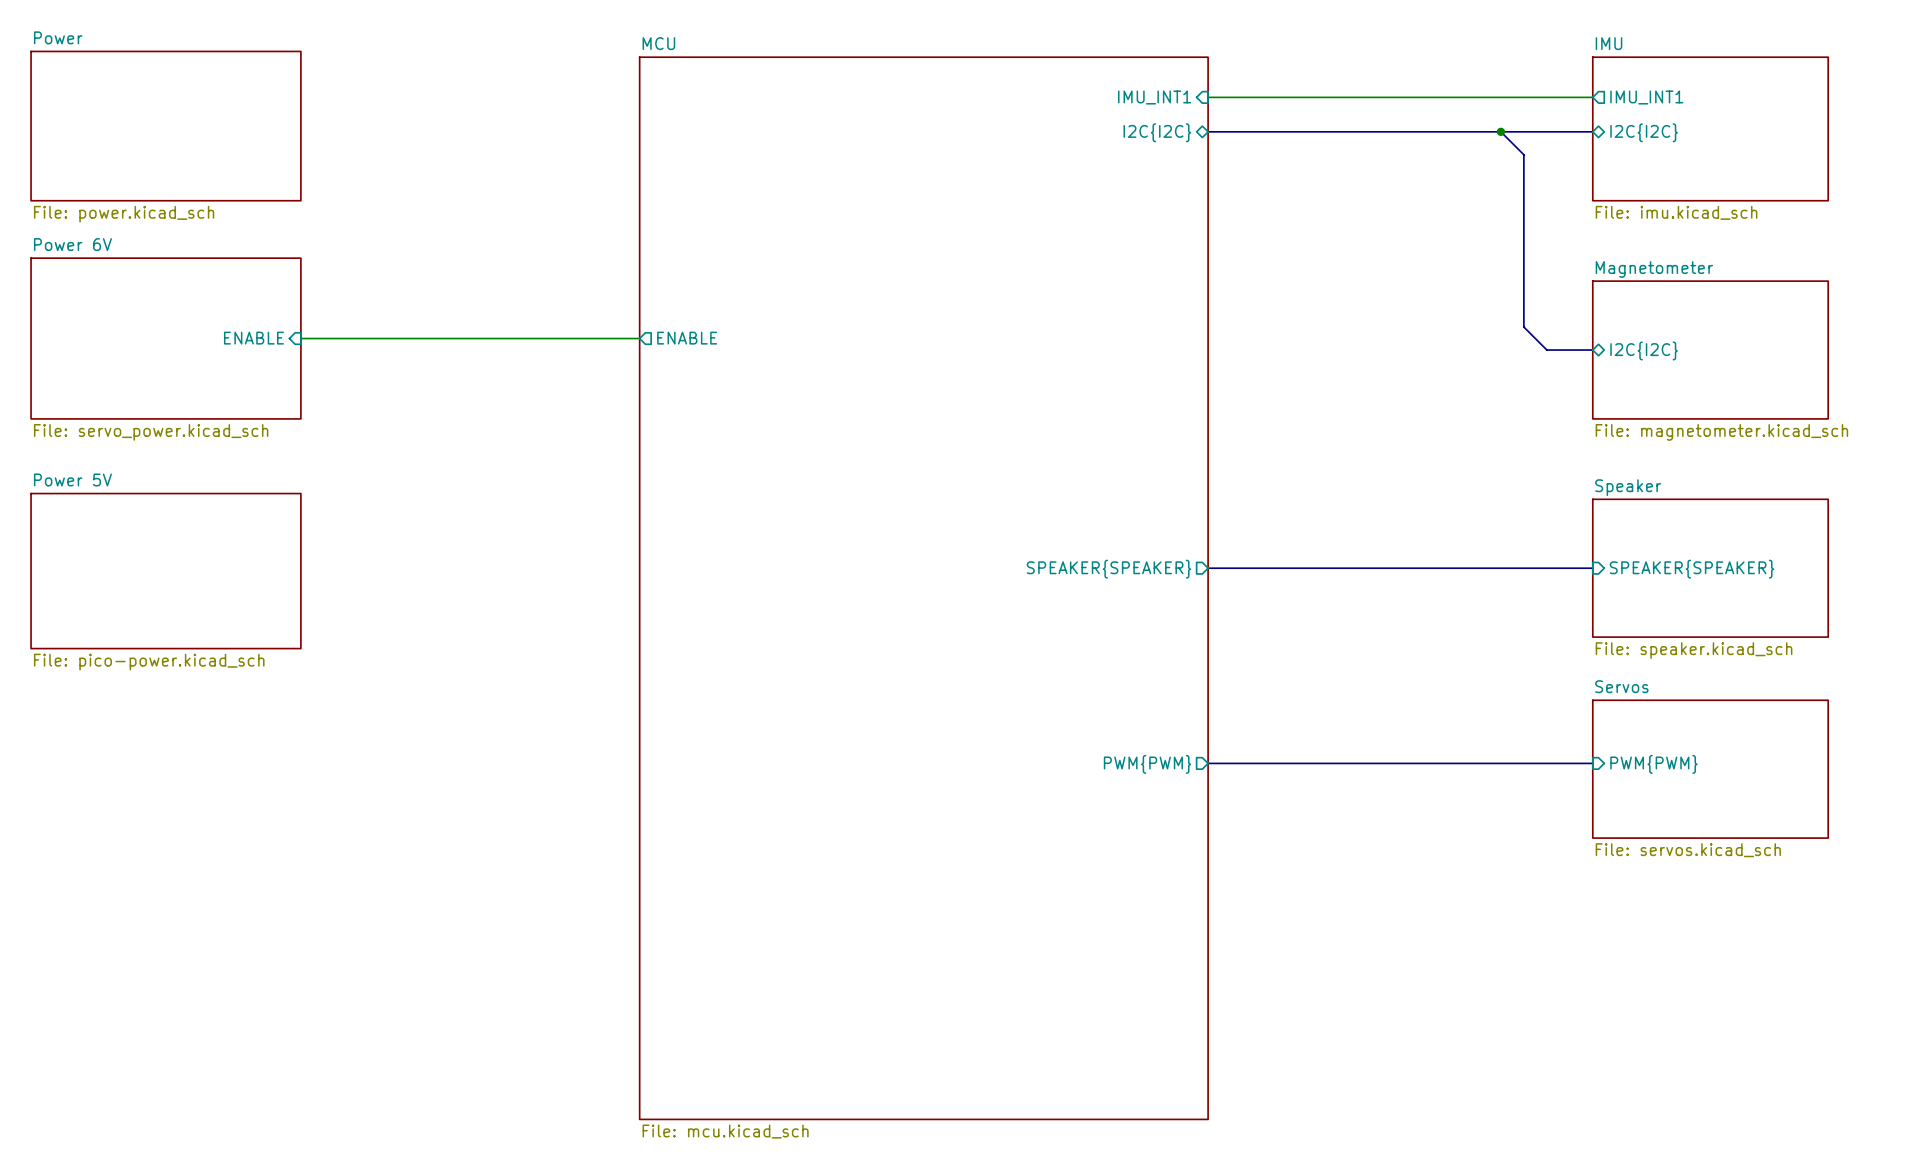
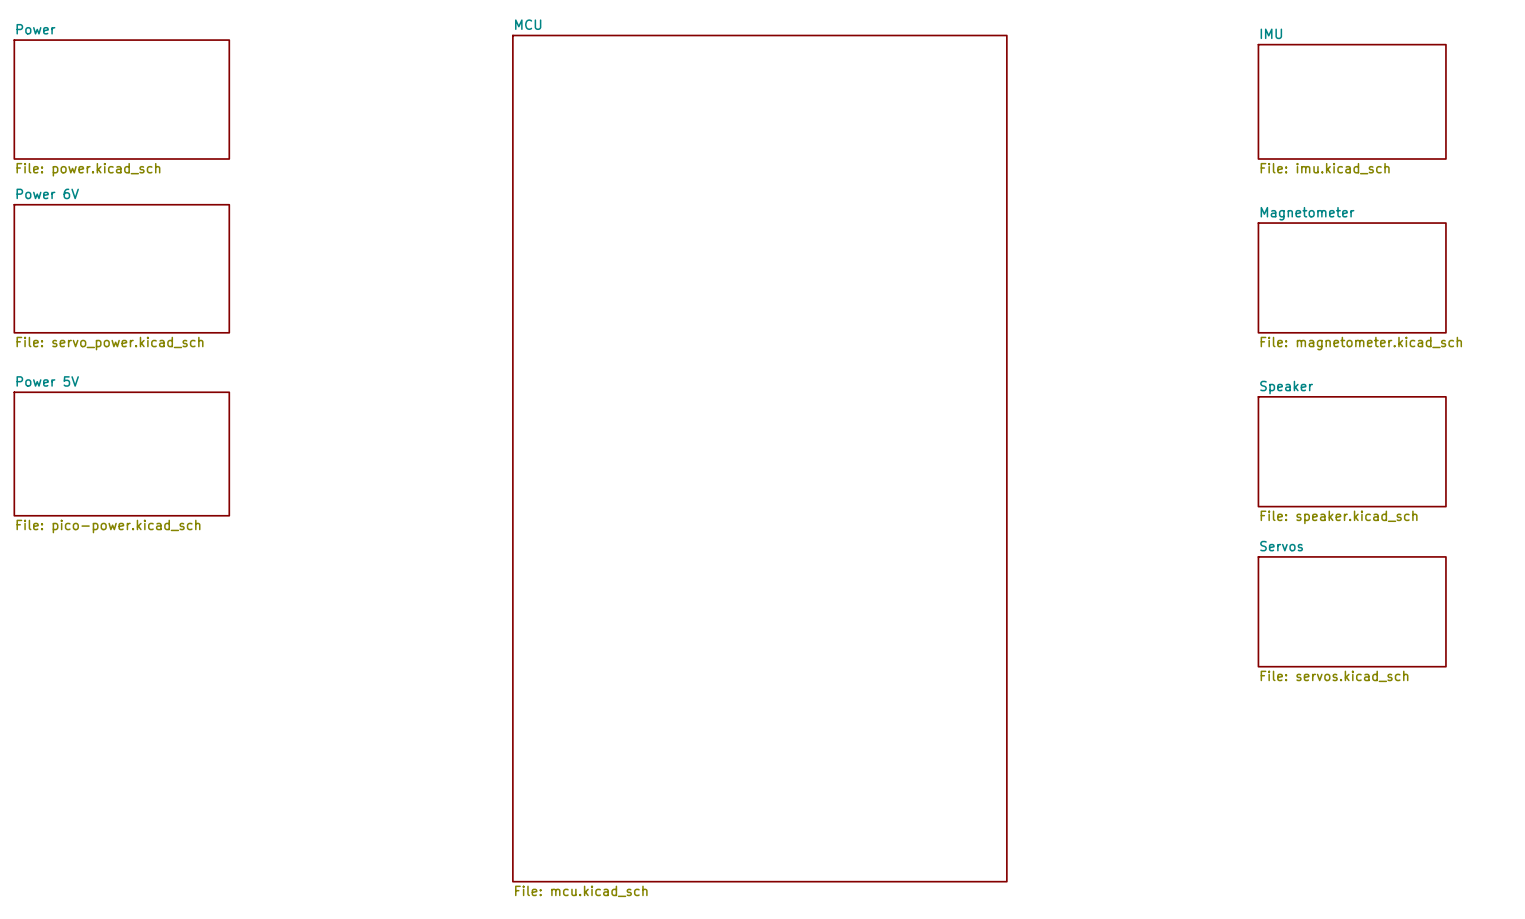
sheet pin: IMU_INT1 (1154, 97) -> none
wire: (1208, 97) (1592, 97) -> none
sheet pin: IMU_INT1 (1646, 97) -> none
bus: (1208, 131) (1592, 131) -> none
bus: (1500, 131) (1523, 154) (1523, 327) (1546, 350) (1592, 350) -> none
junction: (1500, 131) -> none
sheet pin: I2C{I2C} (1157, 132) -> none
sheet pin: I2C{I2C} (1644, 132) -> none
sheet pin: ENABLE (253, 338) -> none
wire: (300, 338) (639, 338) -> none
sheet pin: ENABLE (687, 338) -> none
sheet pin: I2C{I2C} (1644, 350) -> none
bus: (1208, 568) (1592, 568) -> none
sheet pin: SPEAKER{SPEAKER} (1108, 569) -> none
sheet pin: SPEAKER{SPEAKER} (1691, 569) -> none
sheet MCU: none -> File: mcu.kicad_sch (759, 458)
sheet MCU: File: mcu.kicad_sch (923, 588) -> none
bus: (1208, 763) (1592, 763) -> none
sheet pin: PWM{PWM} (1147, 764) -> none
sheet pin: PWM{PWM} (1653, 764) -> none

